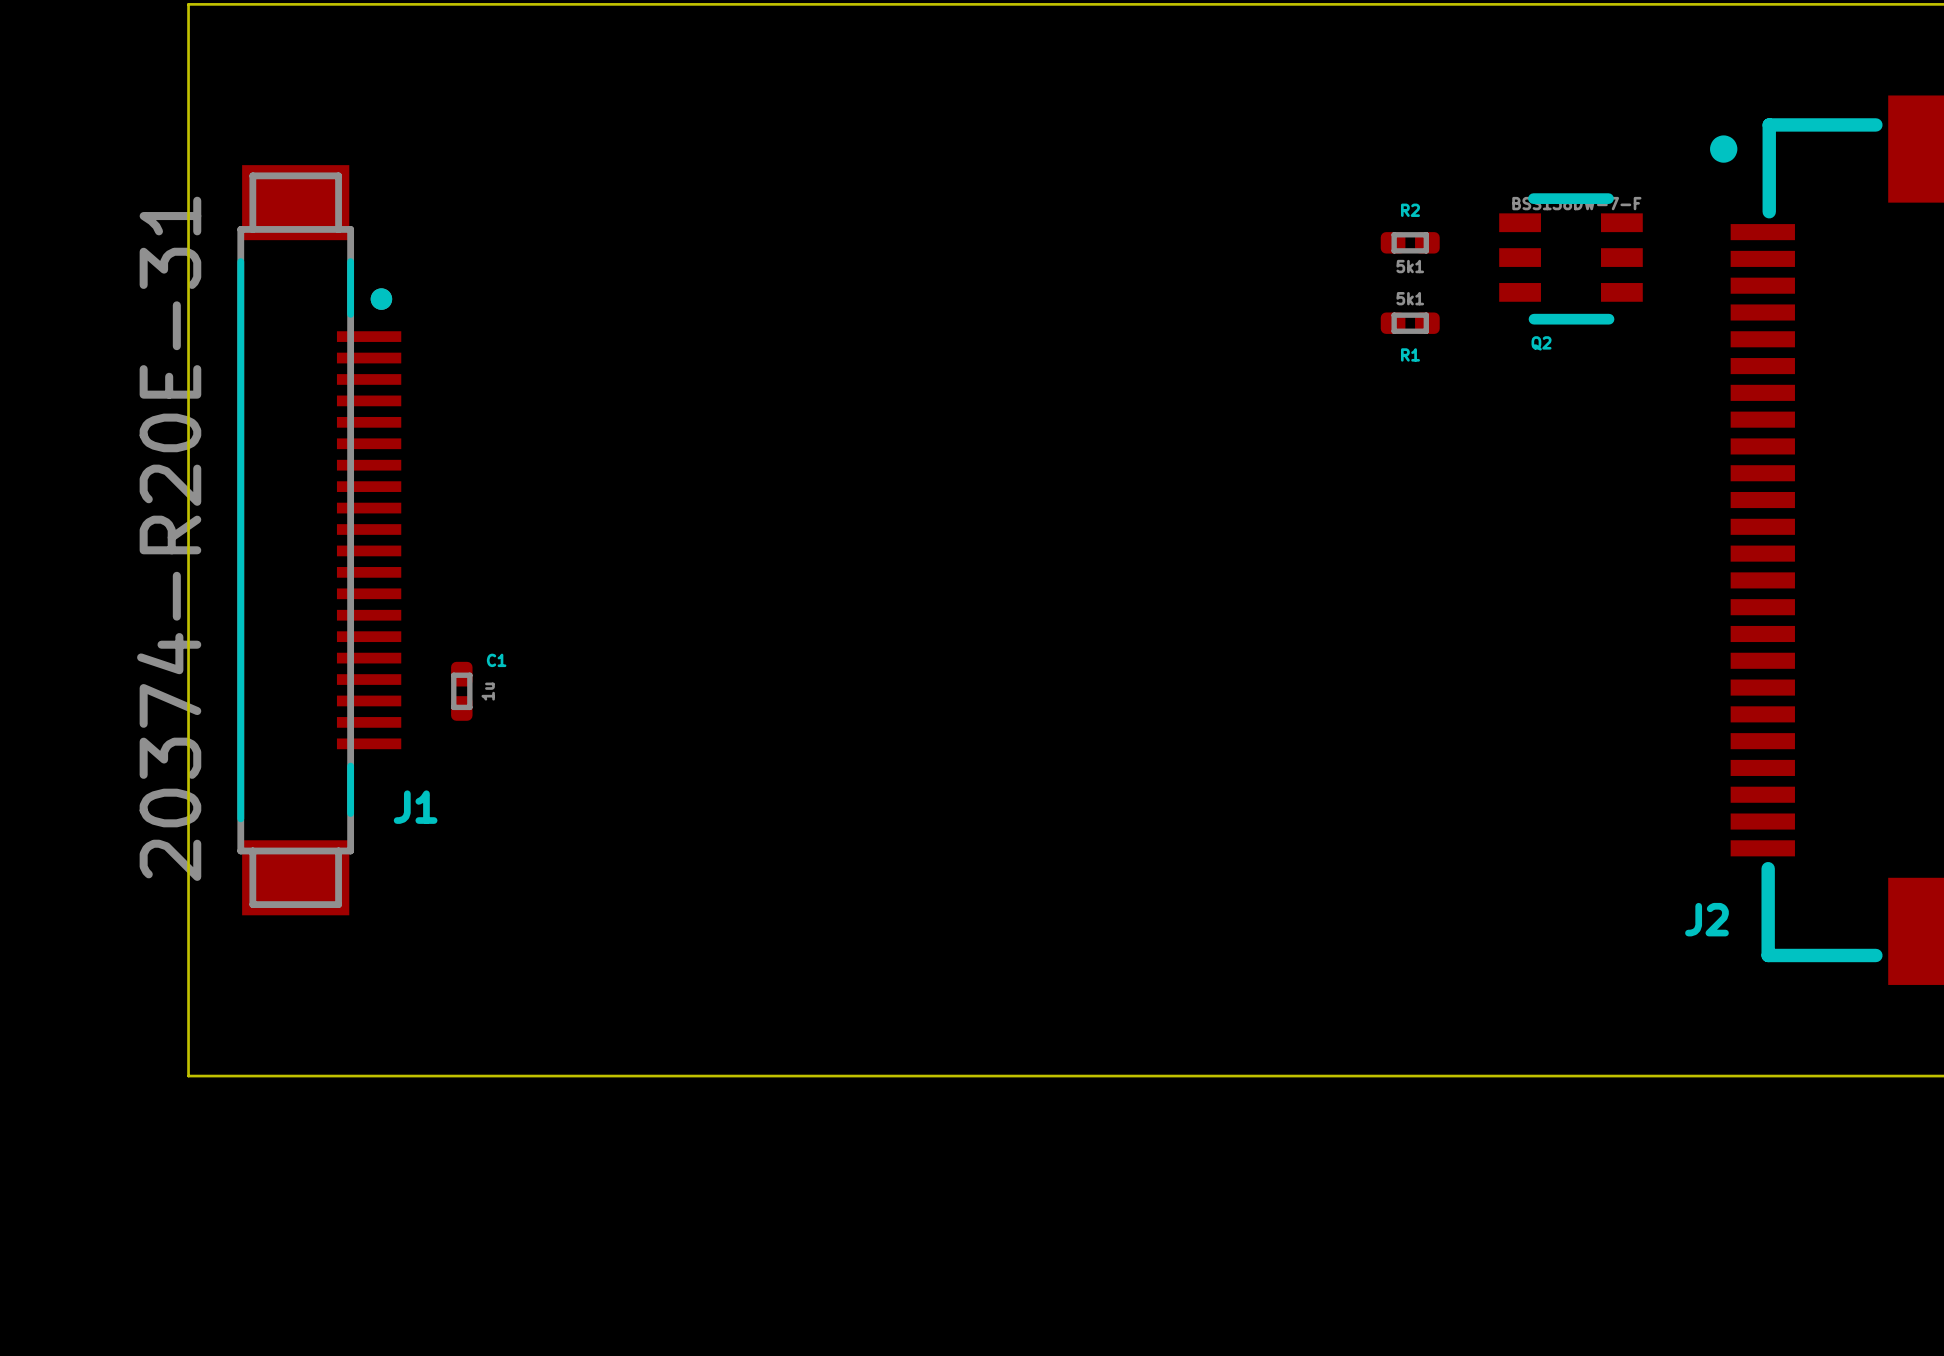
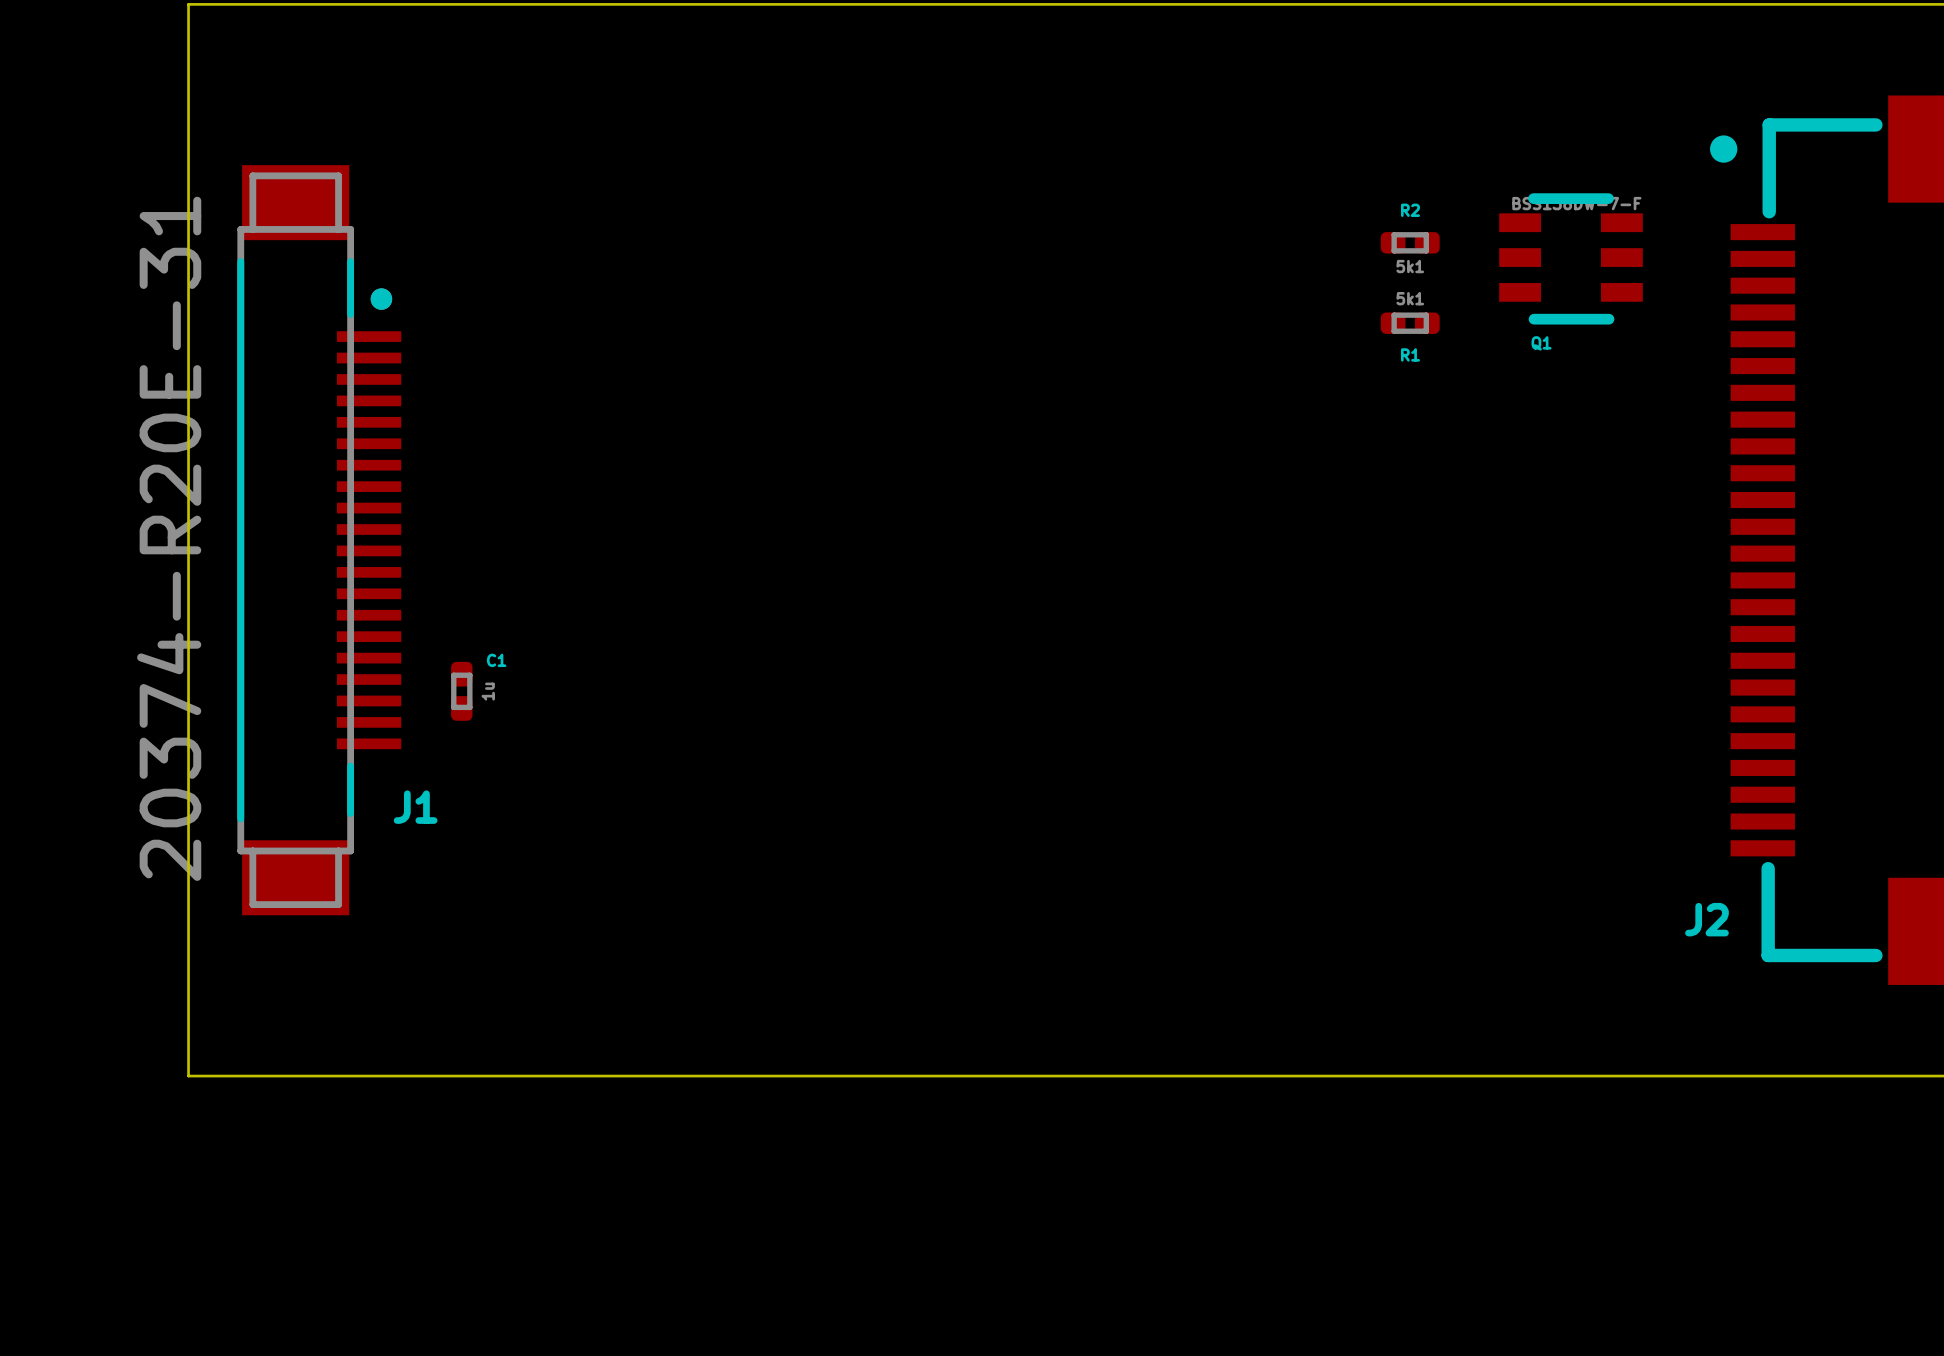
Q2 name: Q2 (1541, 343) -> Q1 (1541, 343)

